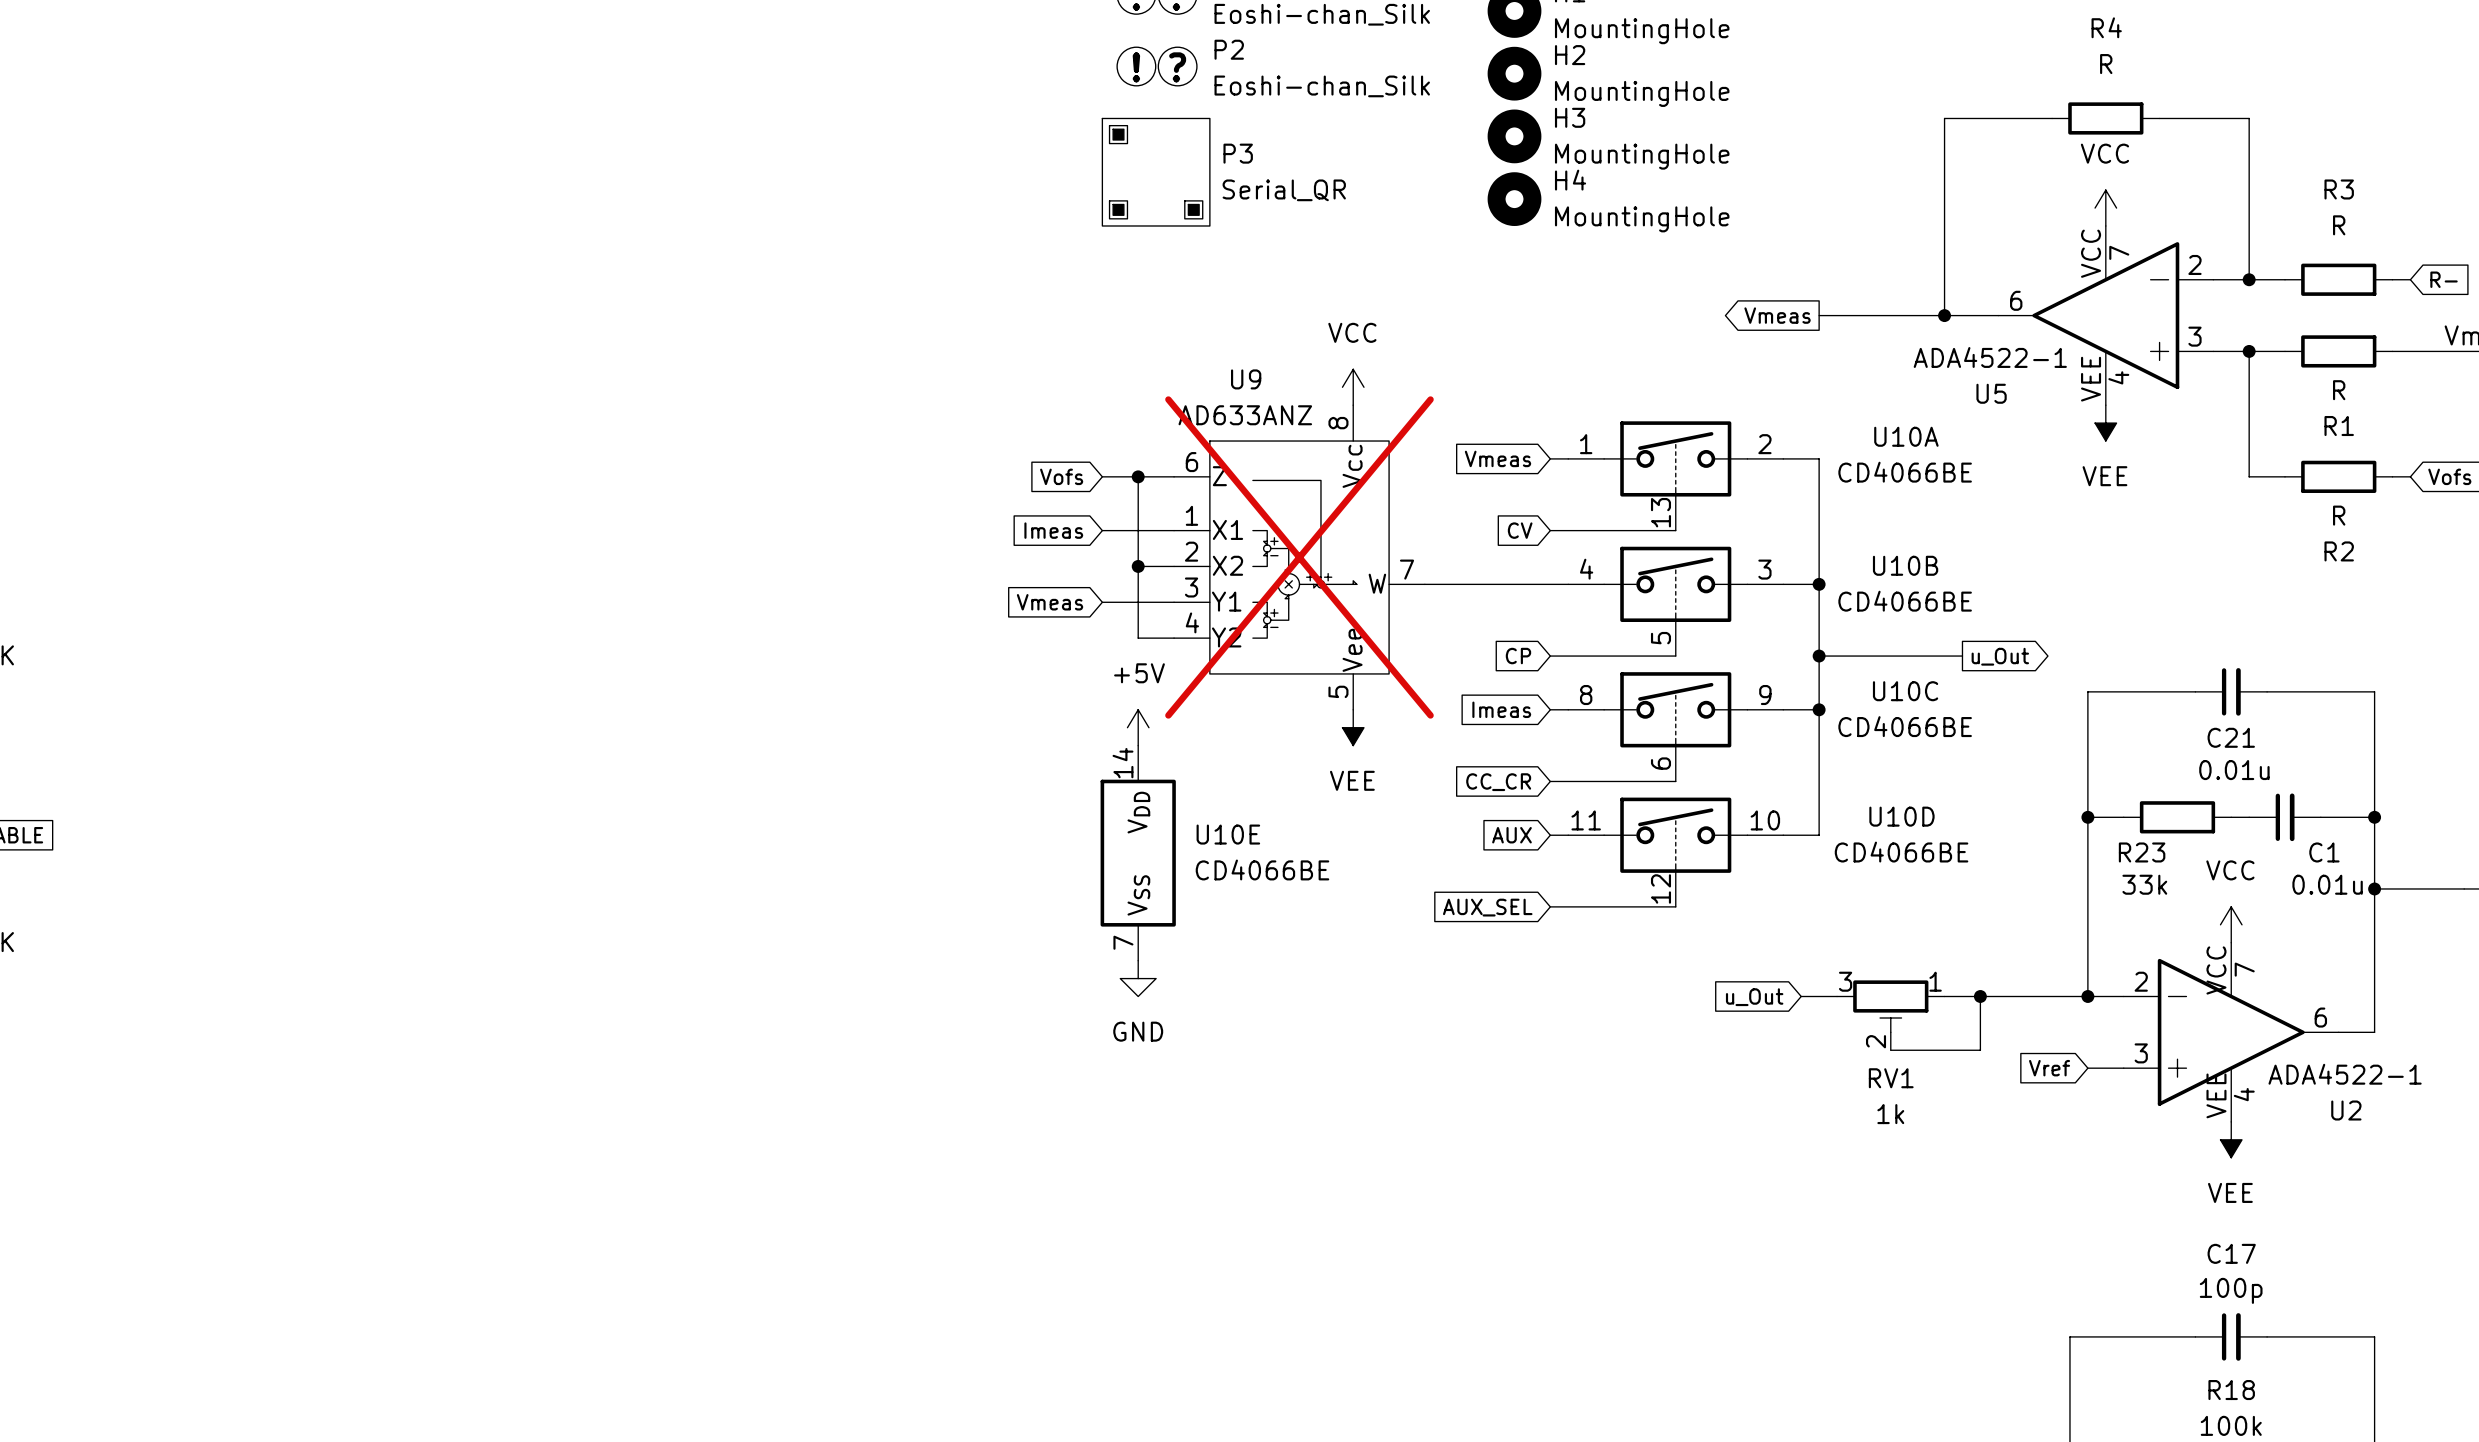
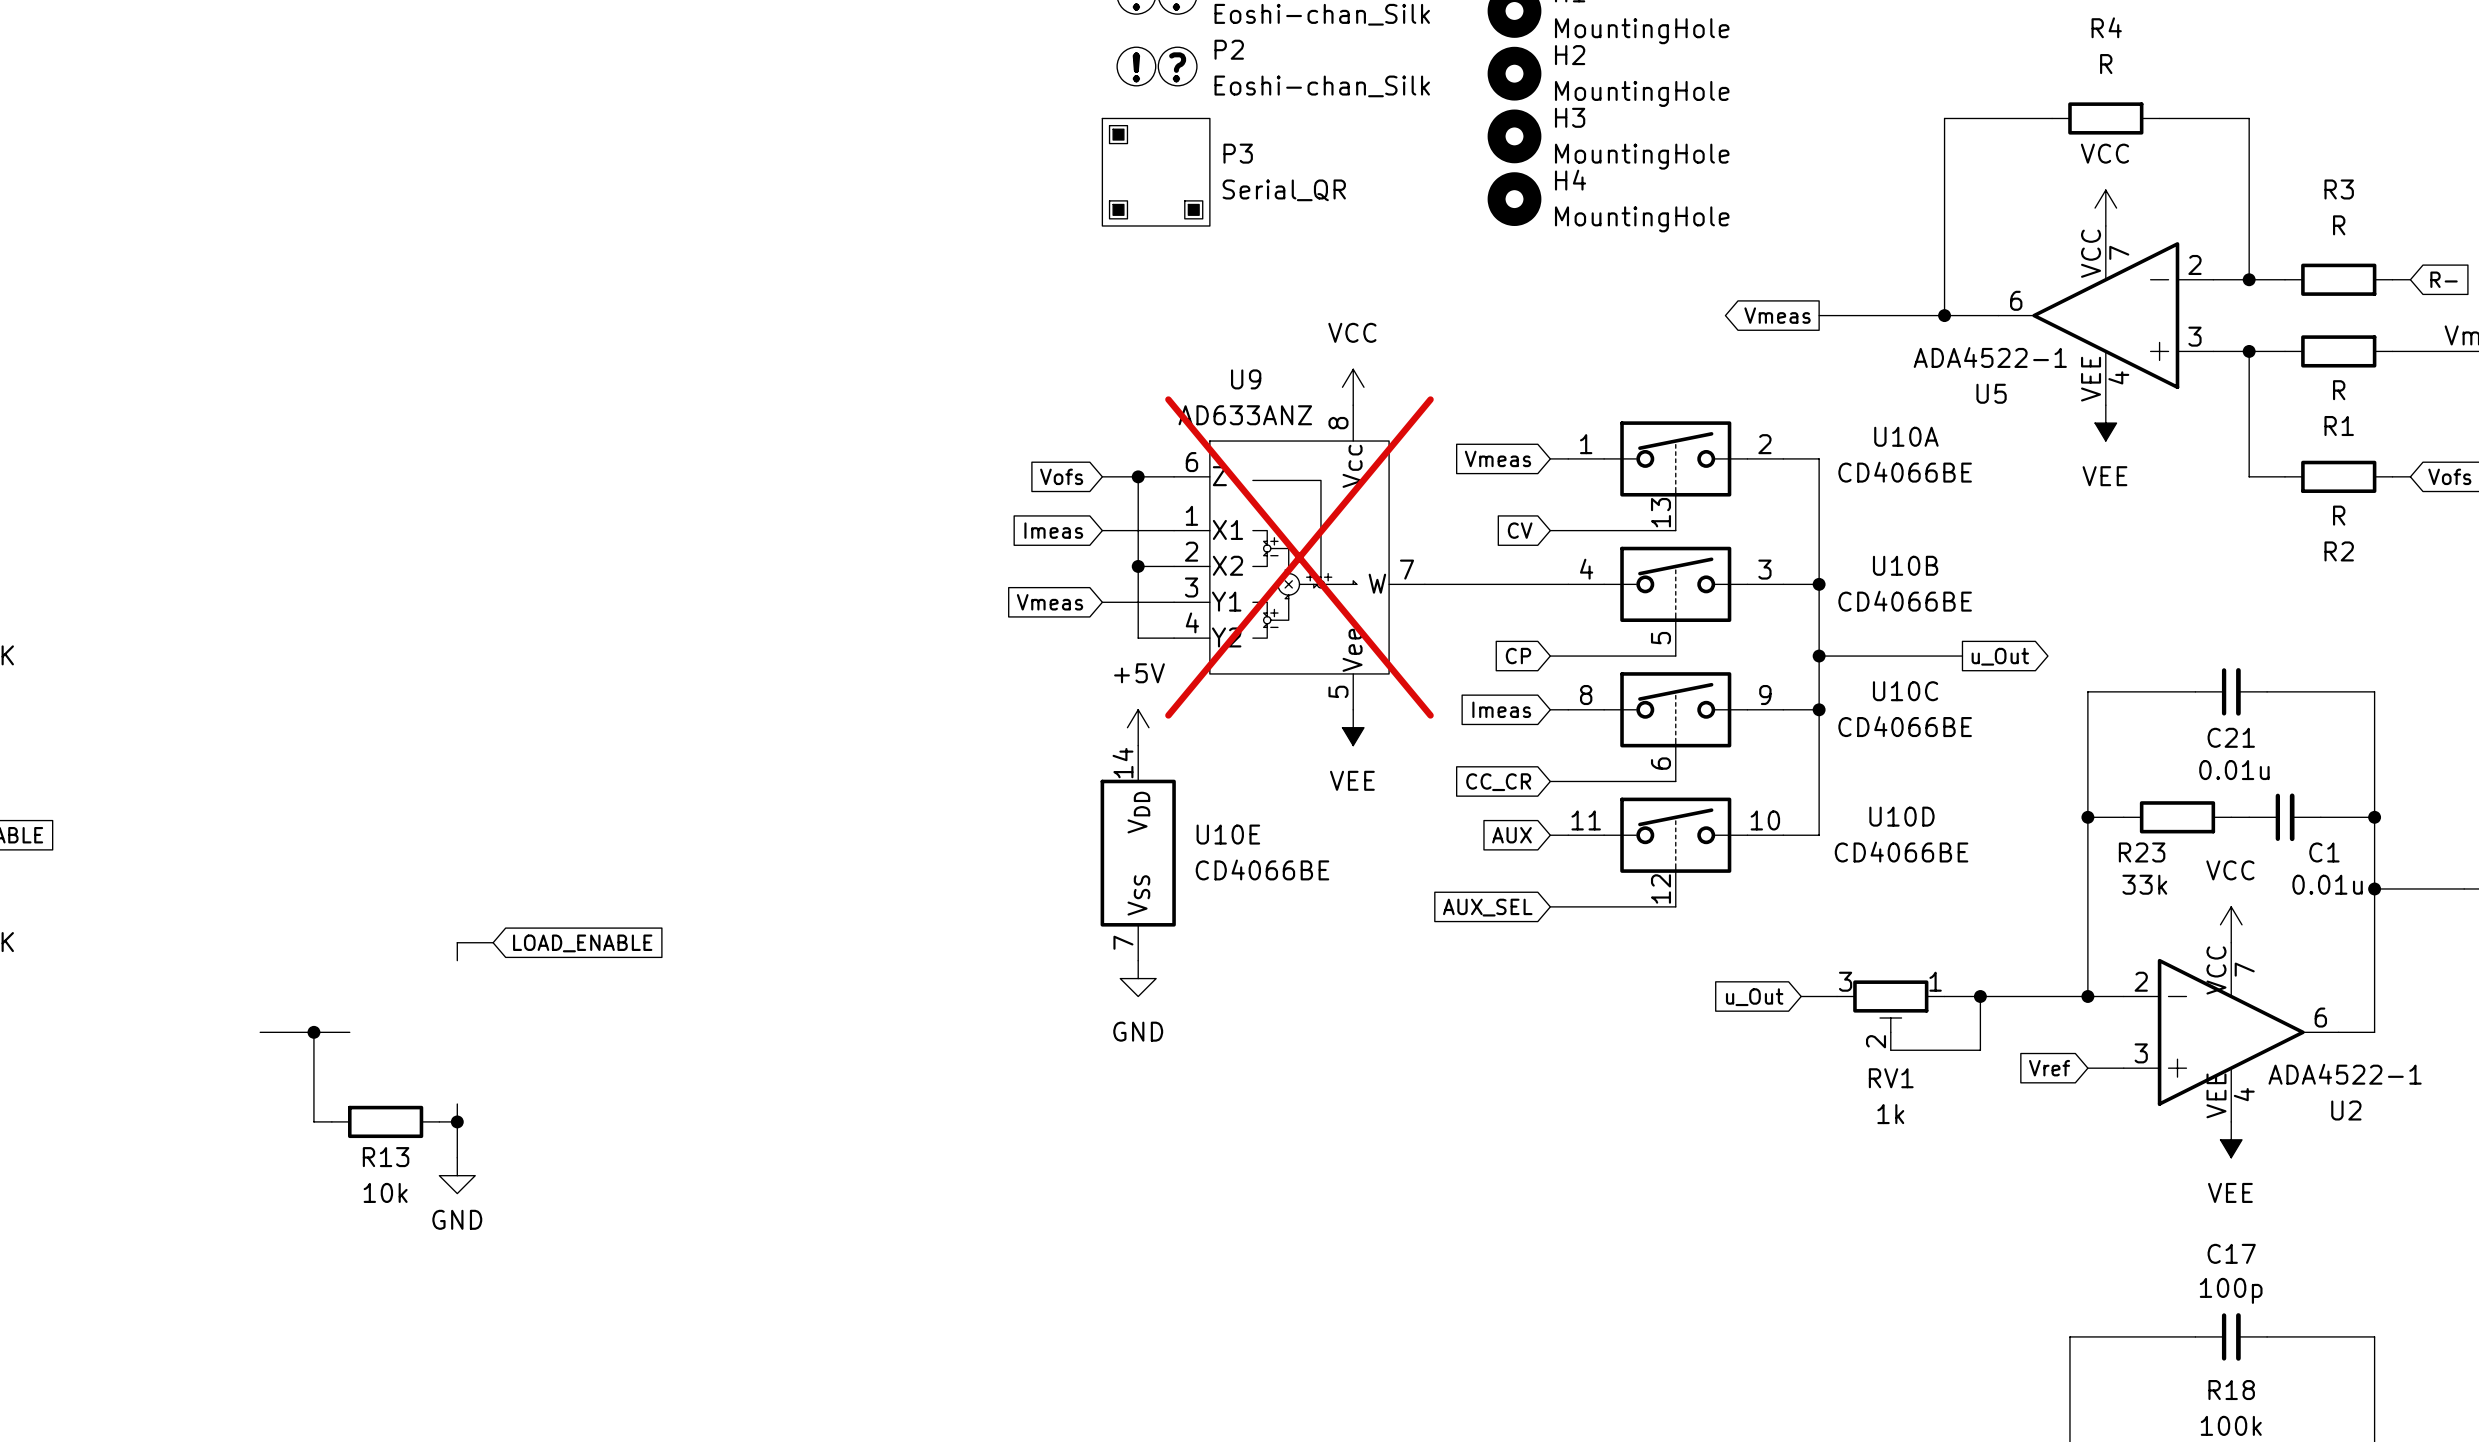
wire: none -> (493, 942) (457, 942) (457, 960)
global label: none -> LOAD_ENABLE (582, 943)
wire: none -> (260, 1032) (349, 1032)
wire: none -> (313, 1032) (313, 1121) (331, 1121)
junction: none -> (313, 1032)
wire: none -> (457, 1104) (457, 1157)
R13: none -> 10k (385, 1121)
wire: none -> (439, 1121) (457, 1121)
junction: none -> (457, 1121)
power symbol: none -> GND (457, 1175)

